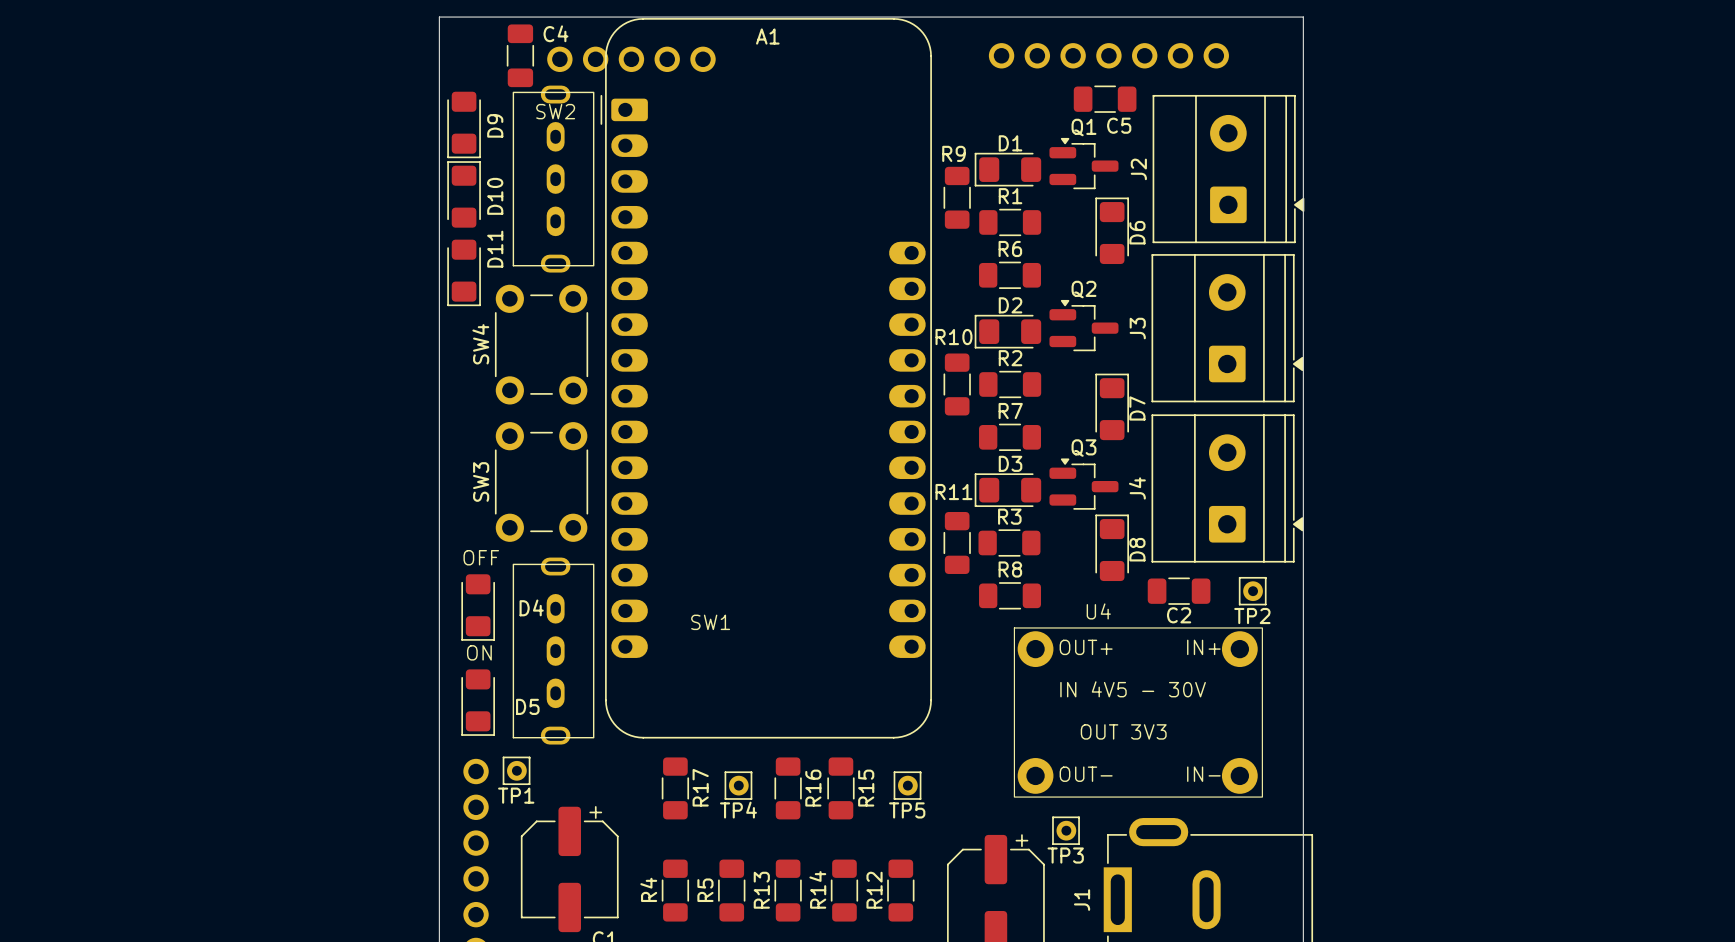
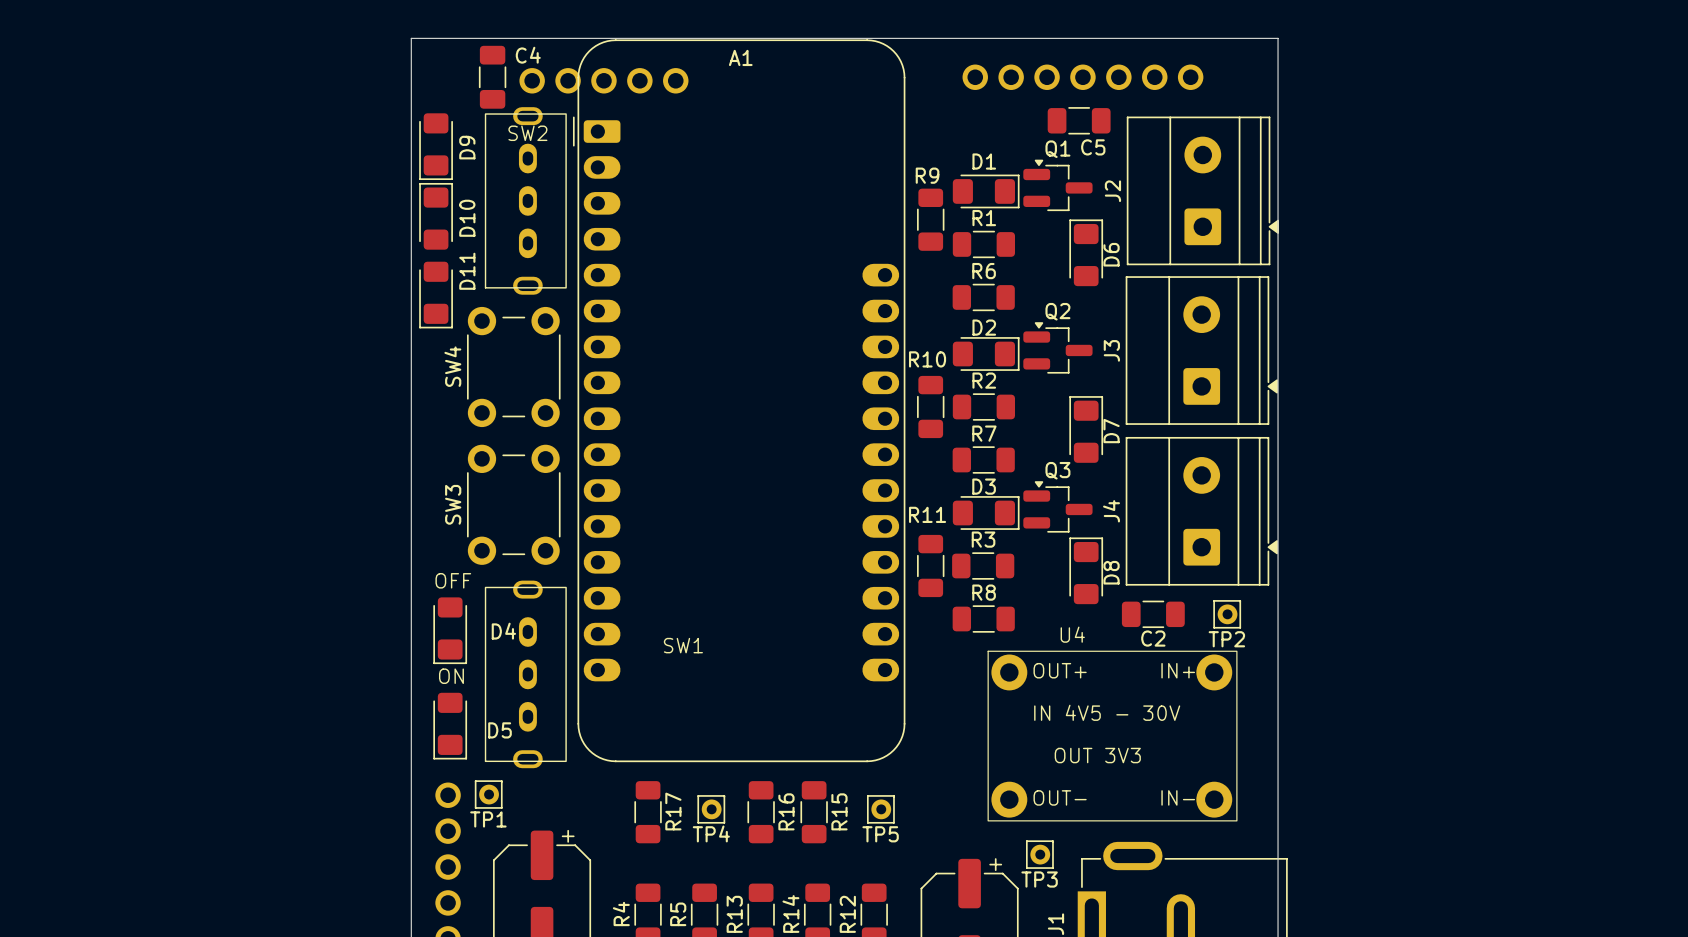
D1 rotation: 0° (1007, 169) -> 180° (986, 191)
D2 rotation: 0° (1007, 331) -> 180° (986, 353)
D3 rotation: 0° (1007, 490) -> 180° (986, 513)

